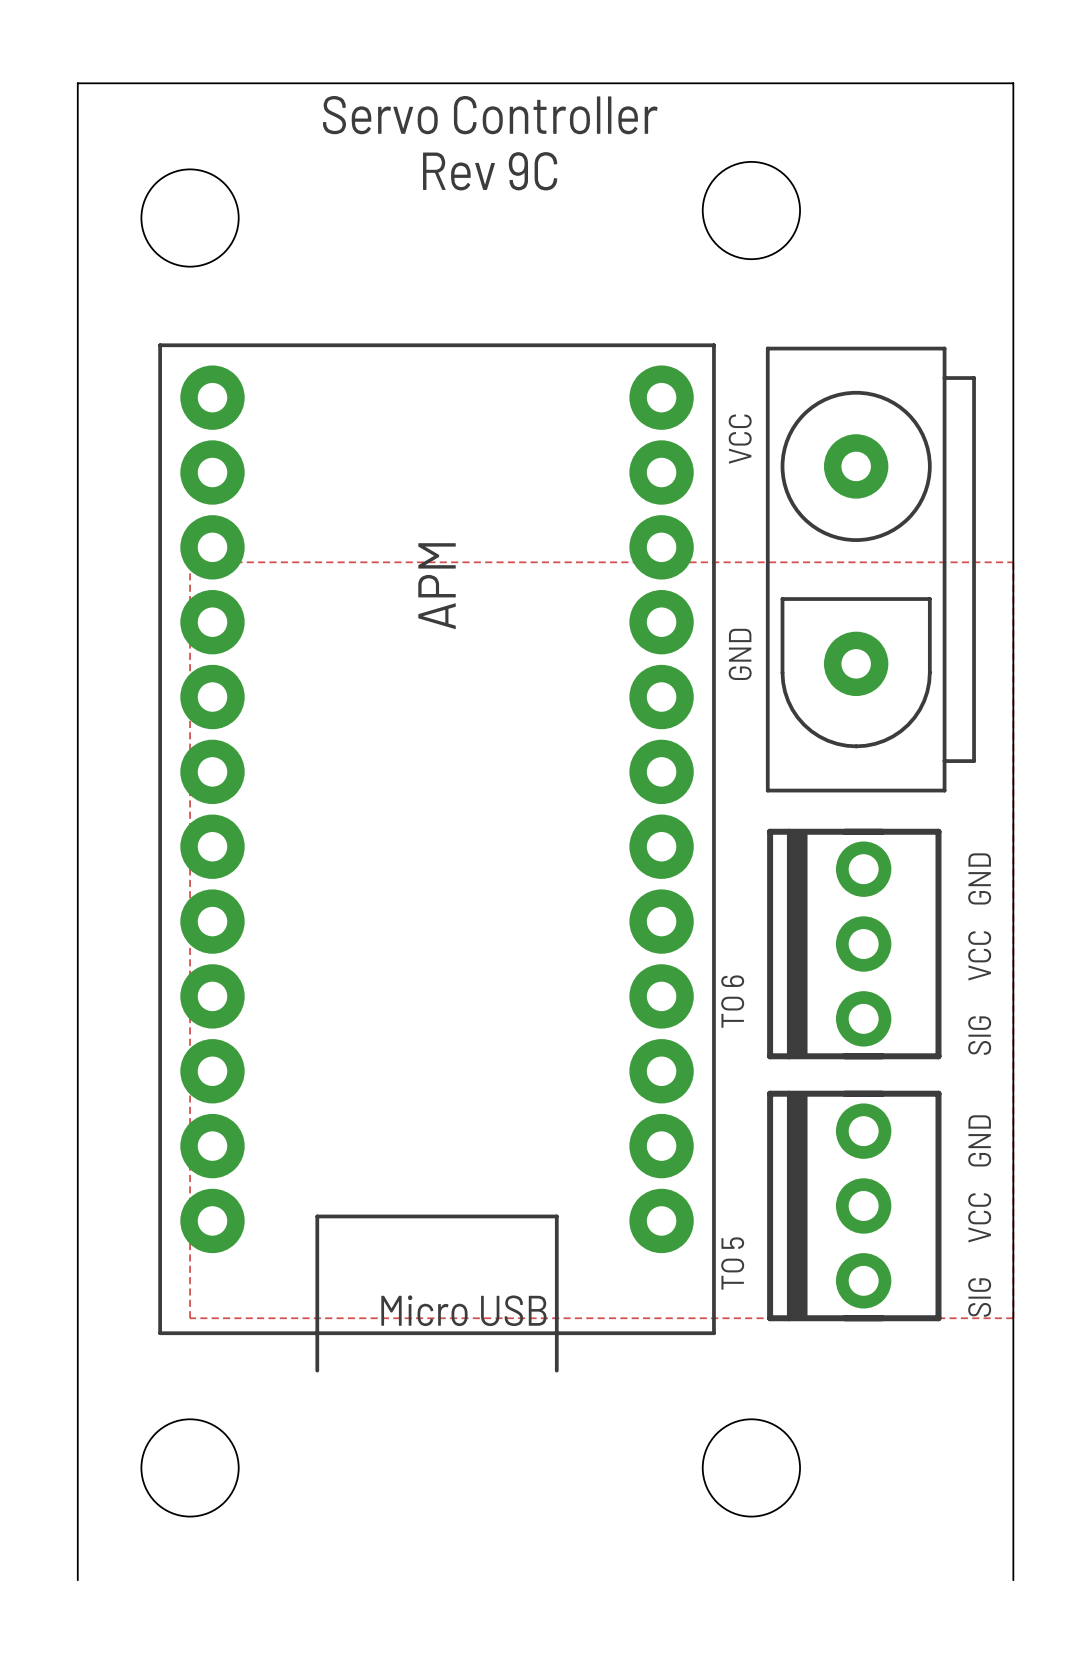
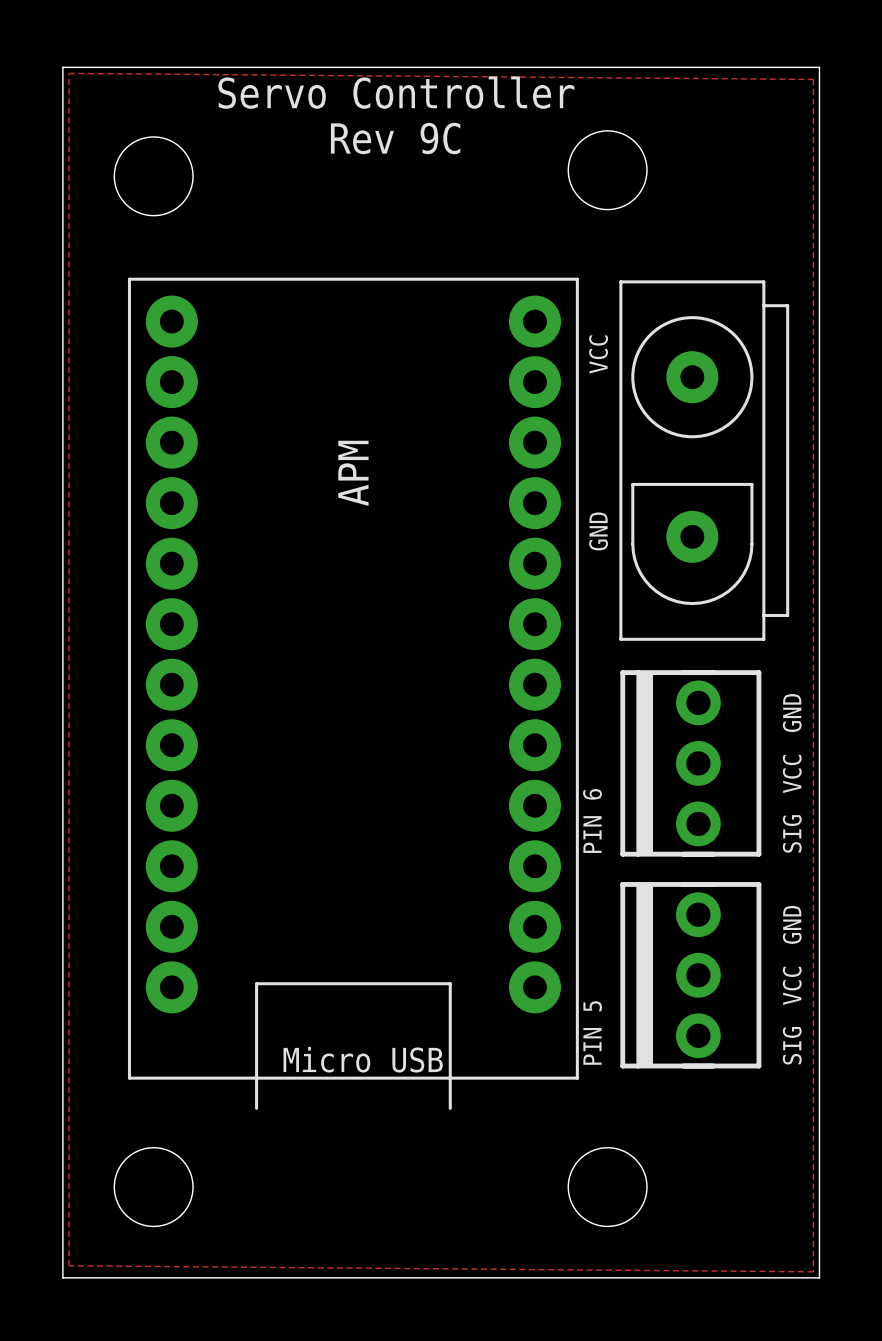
zone outline: none -> (68, 73) (813, 79) (813, 1271) (68, 1265) (68, 73)
zone outline: (190, 562) (1013, 562) (1013, 1318) (190, 1318) (190, 562) -> none
text: TO 6 (732, 1001) -> PIN 6 (592, 821)
text: TO 5 (732, 1263) -> PIN 5 (592, 1033)
board edge: none -> (62, 1277) (819, 1277)

